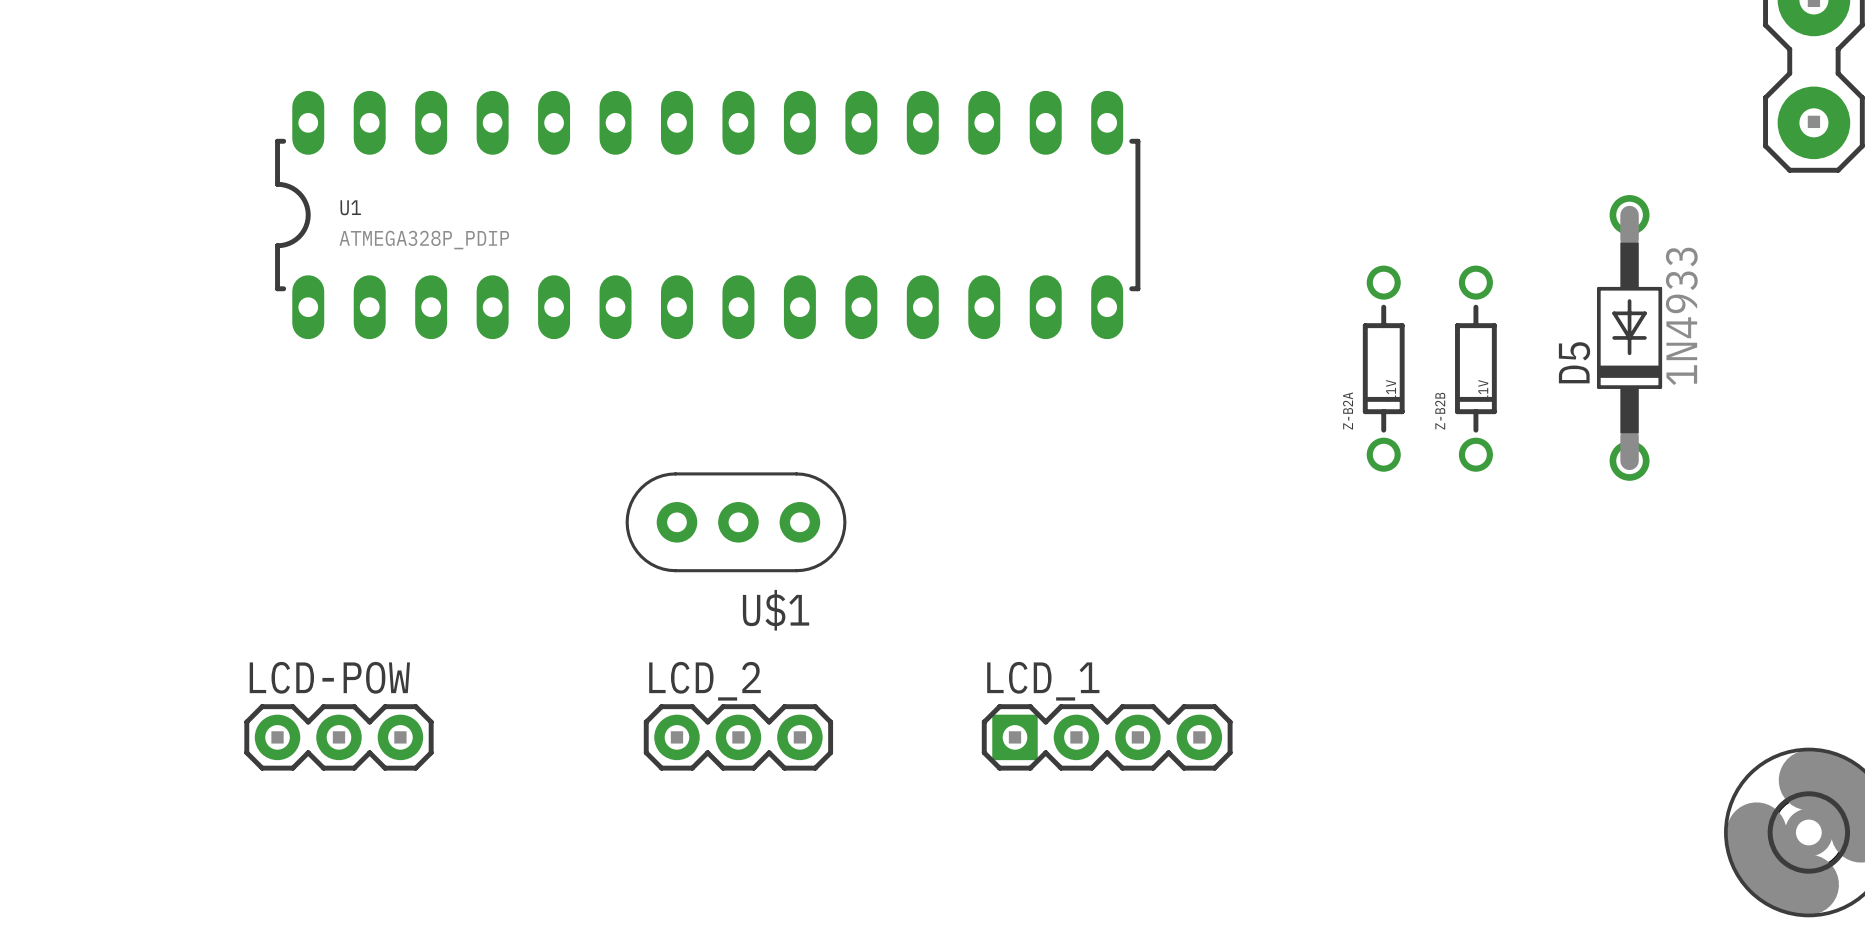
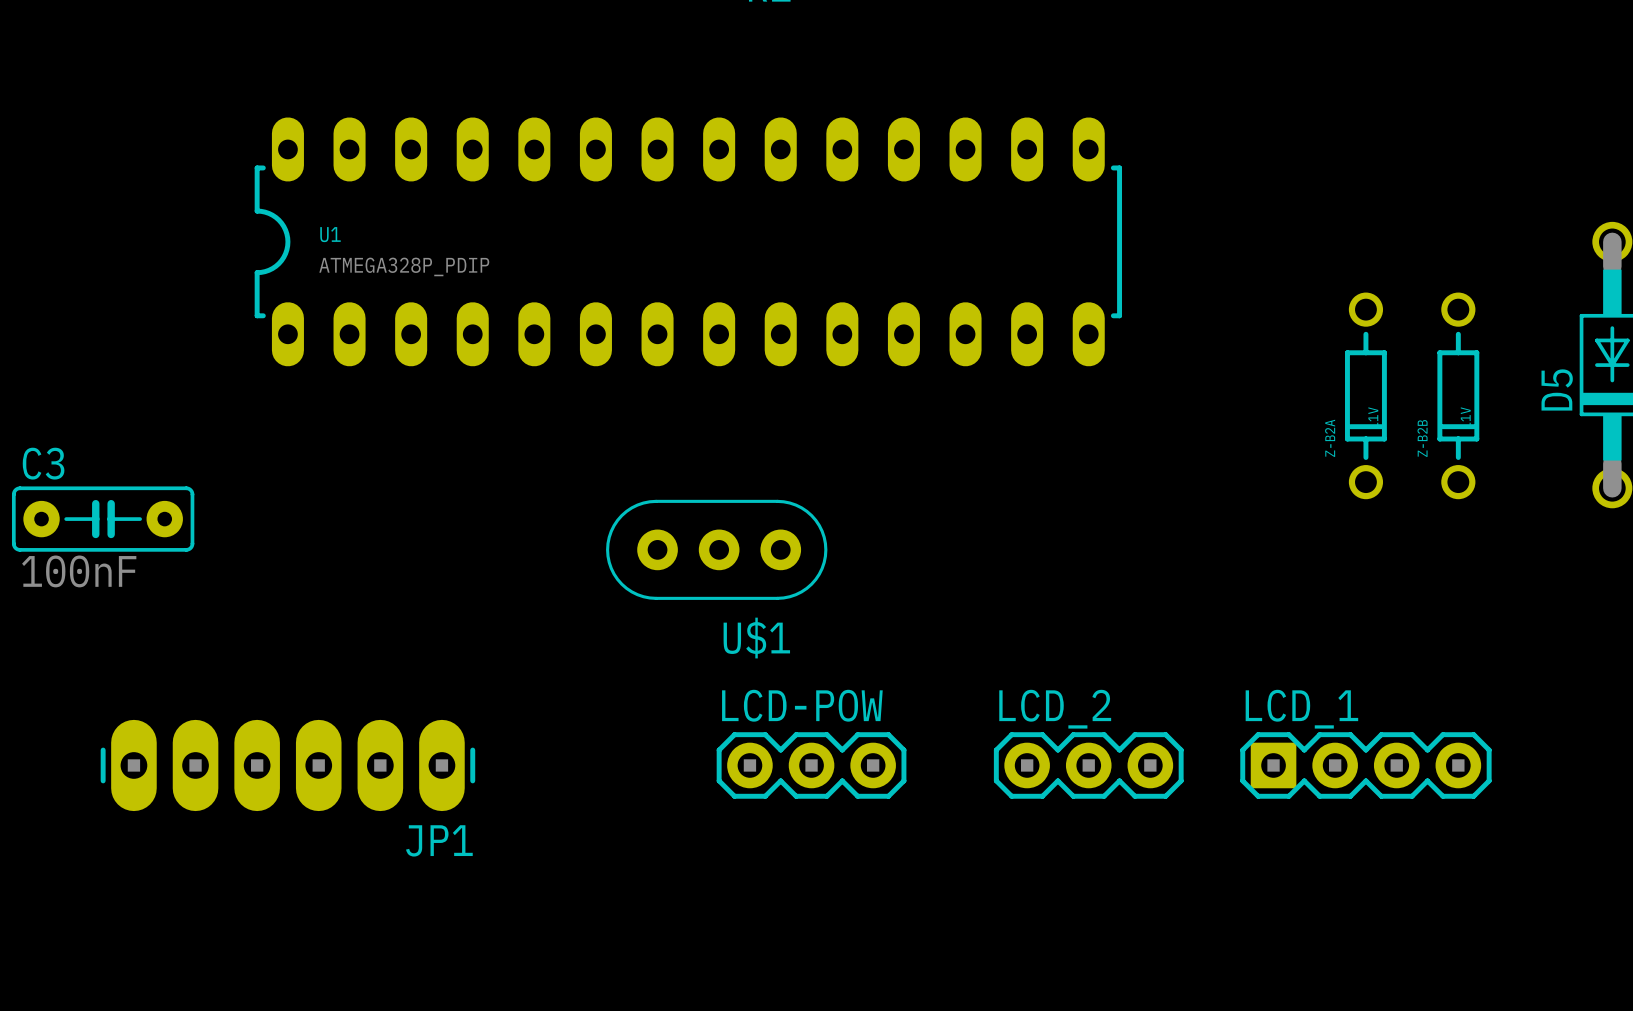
C3: none -> 100nF (103, 519)
JP1: none -> (287, 765)
LCD-POW position: (338, 737) -> (811, 765)
LCD_2 position: (738, 737) -> (1088, 765)
LCD_1 position: (1107, 737) -> (1365, 765)

